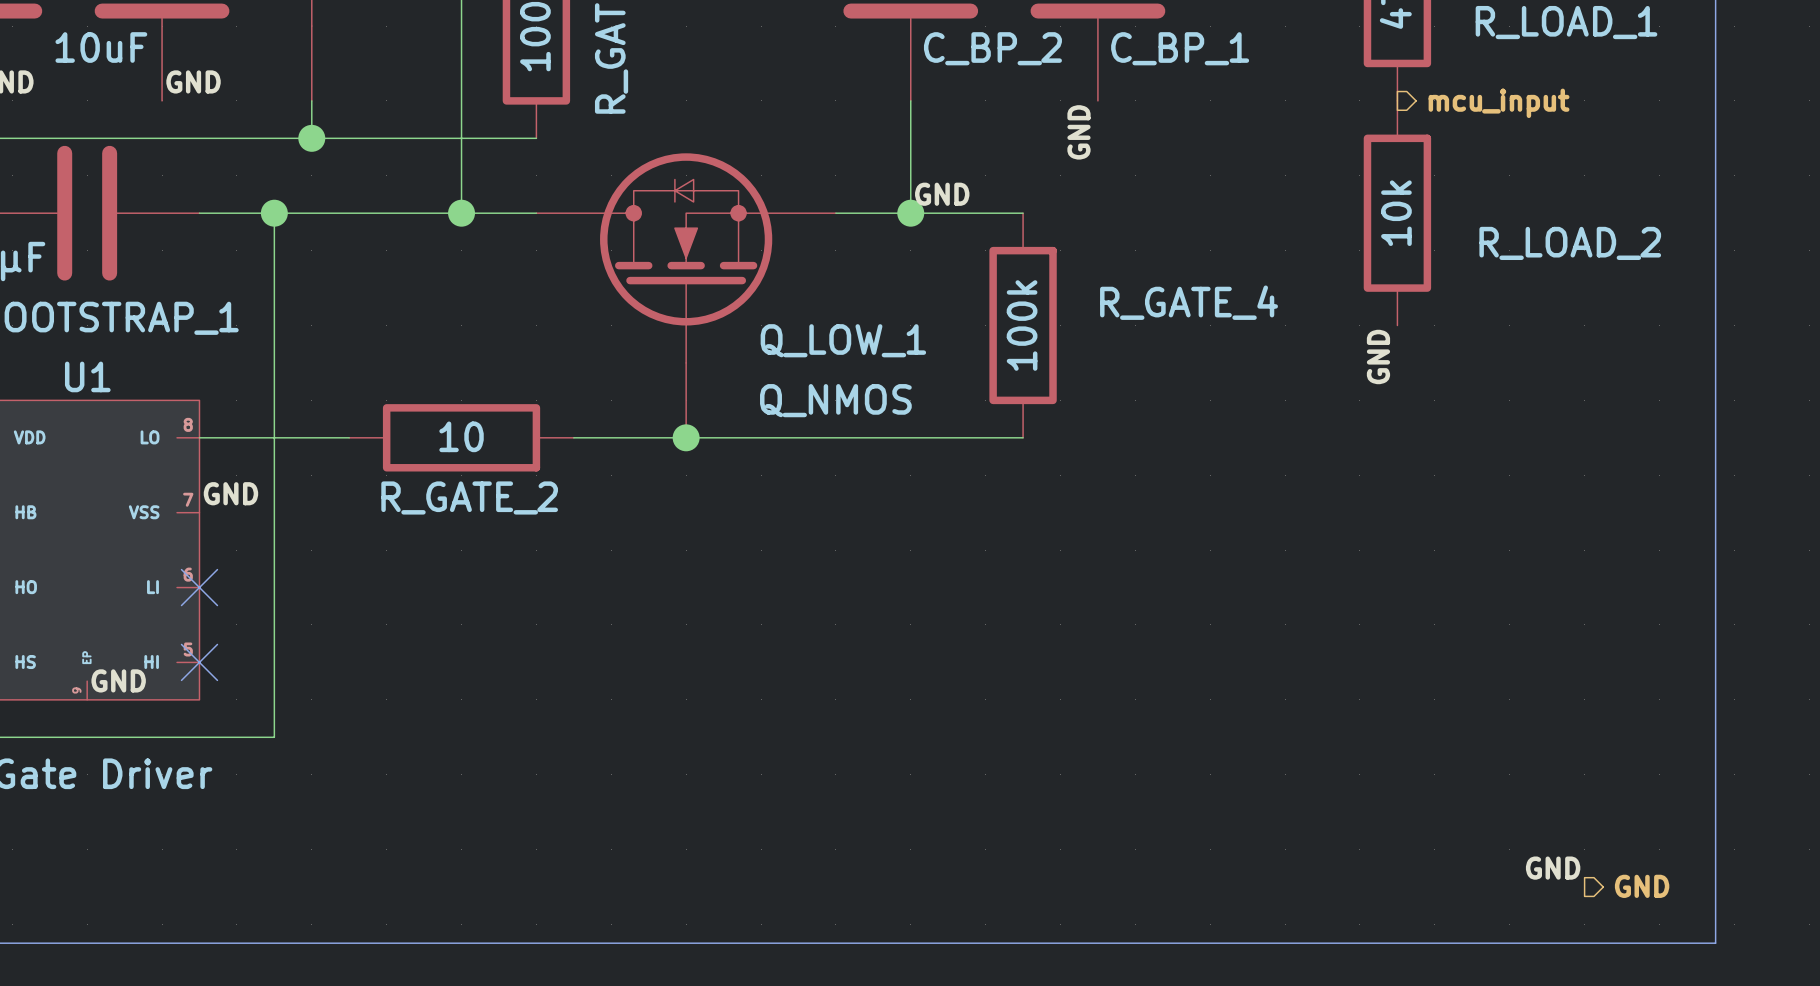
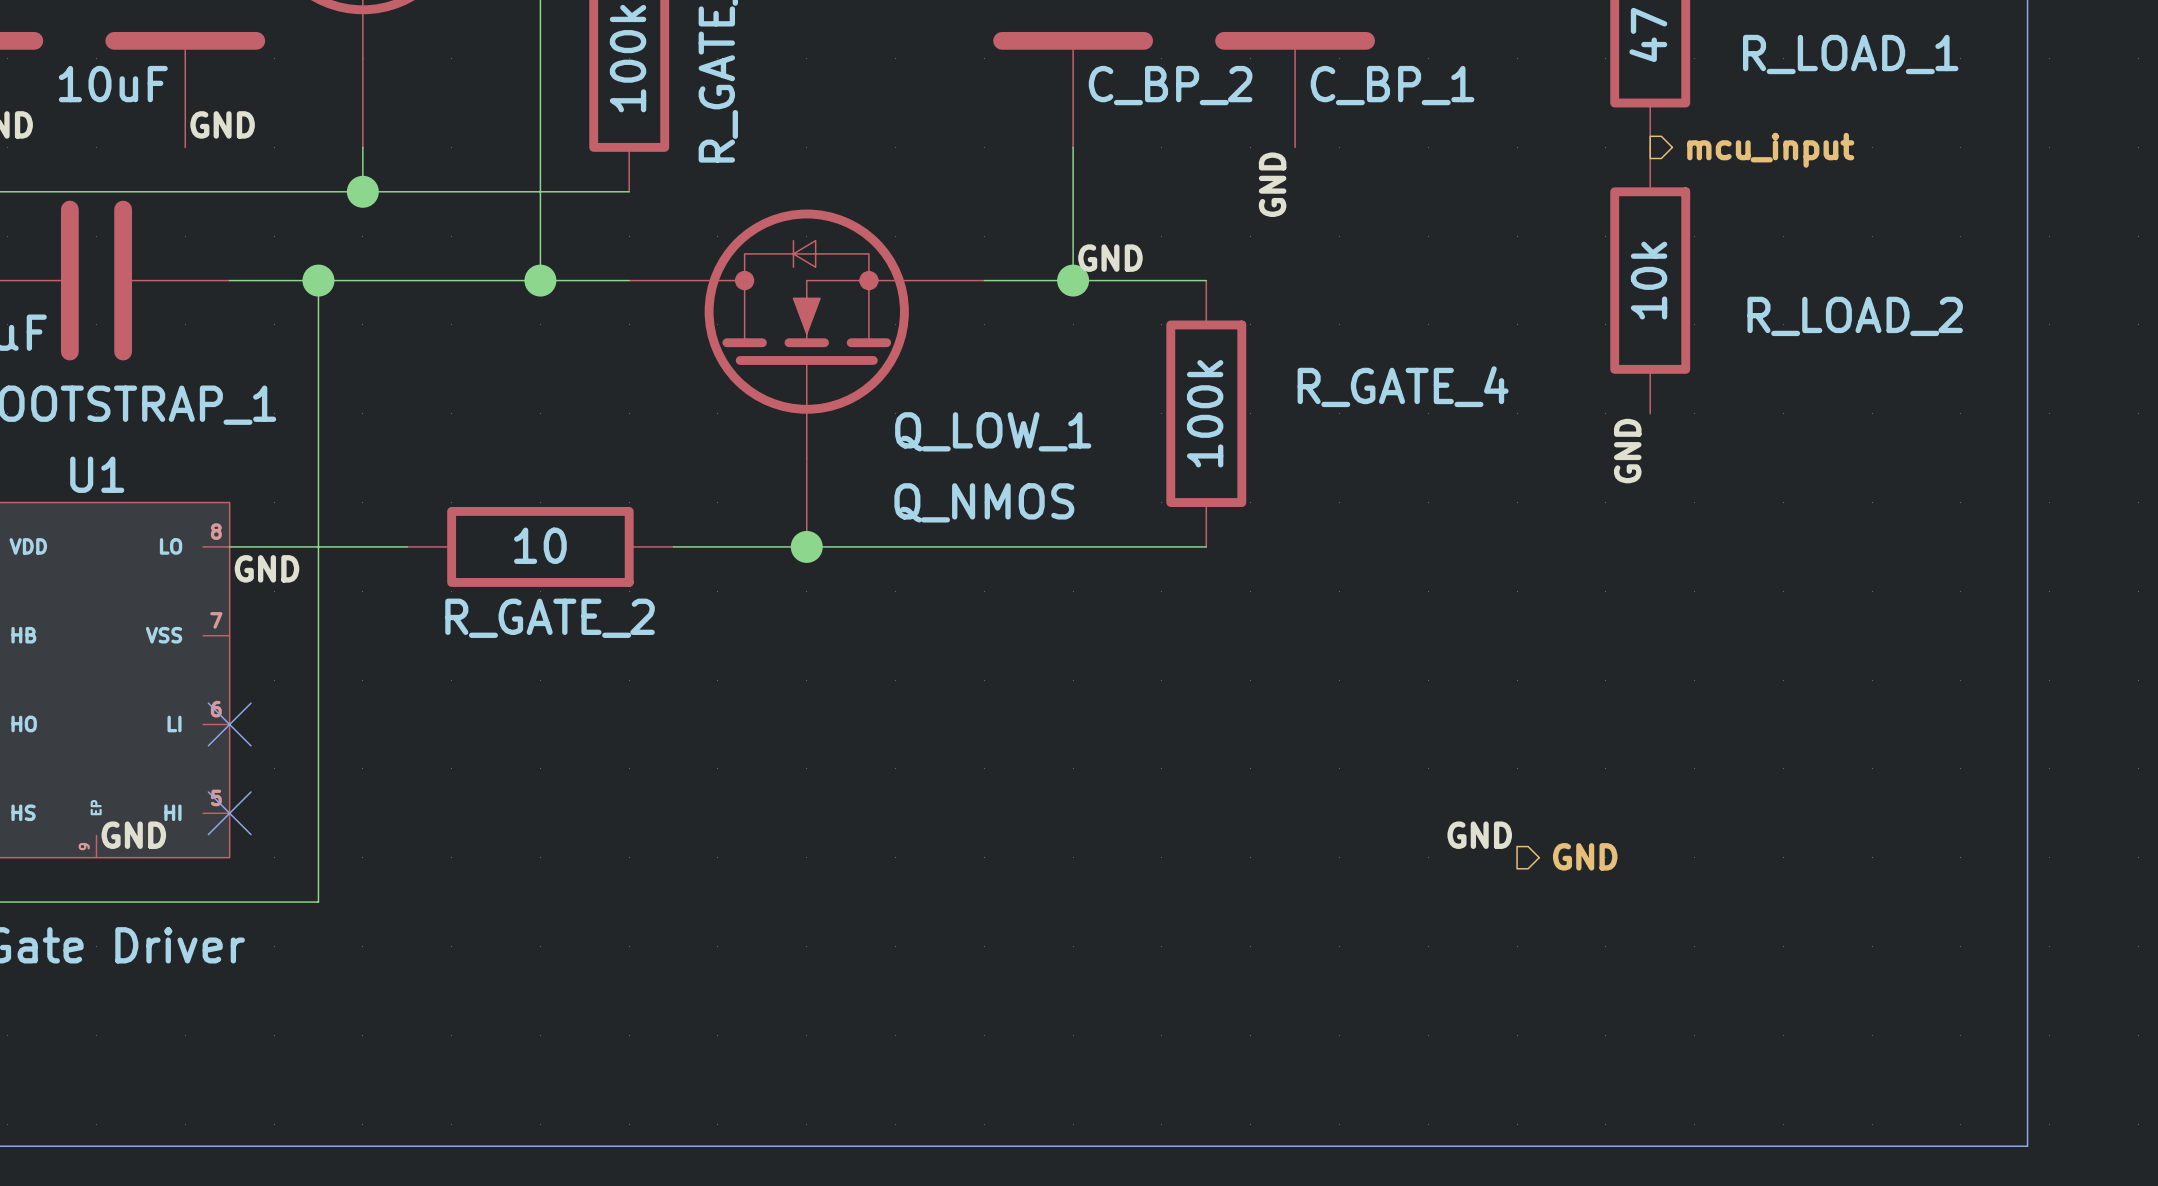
label position: GND (230, 493) -> GND (267, 568)
label position: GND (1553, 868) -> GND (1479, 835)
hierarchical label position: GND (1642, 886) -> GND (1585, 856)

